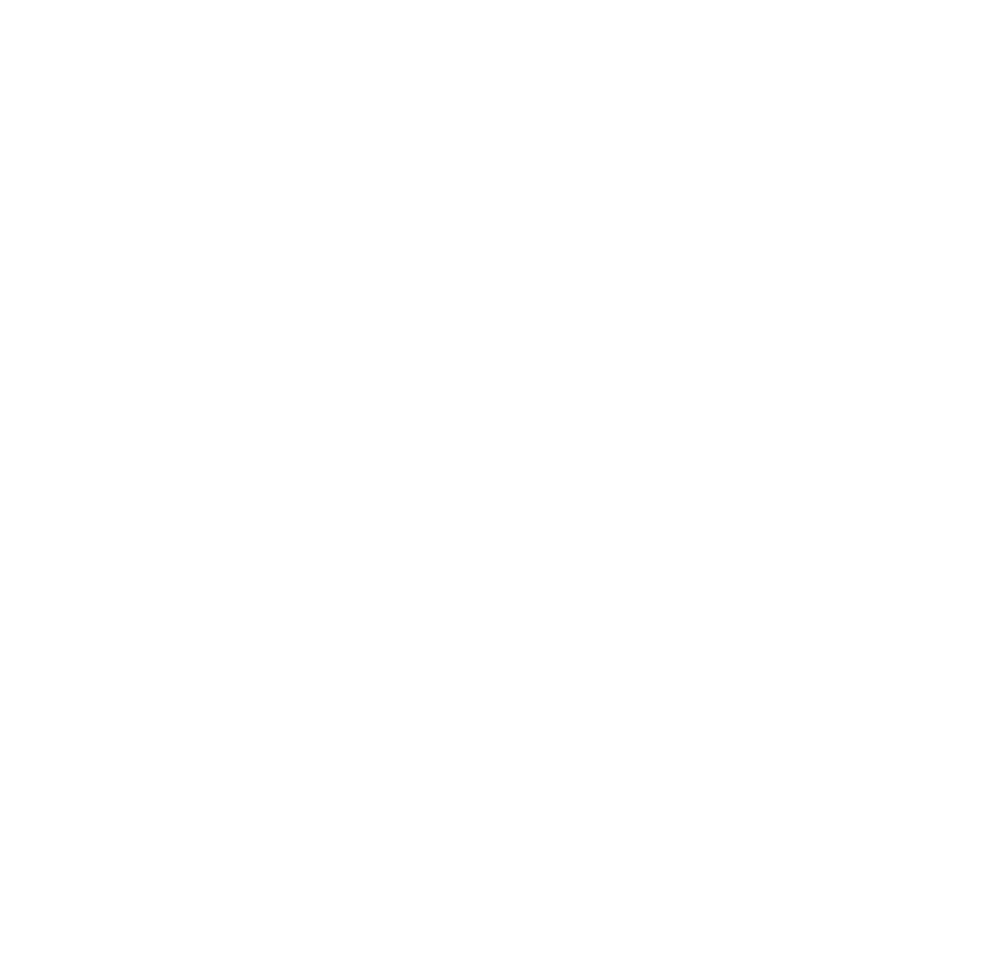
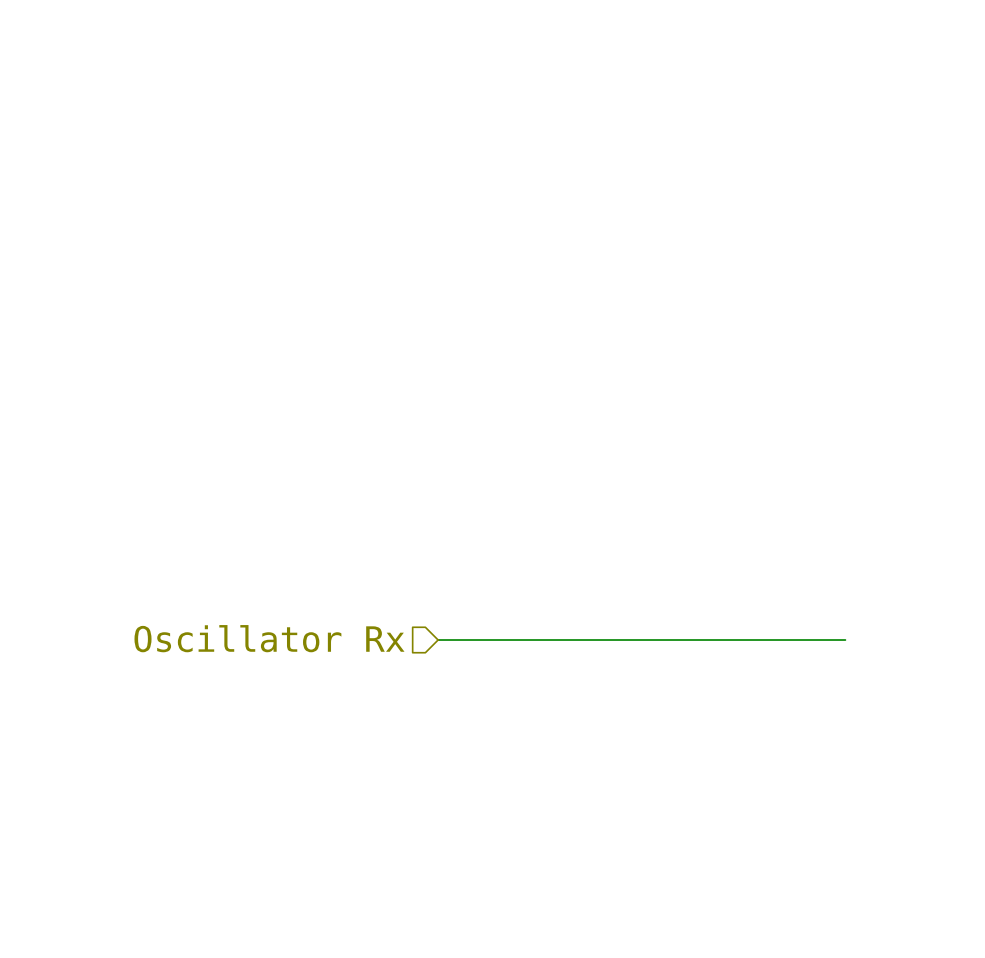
hierarchical label: none -> Oscillator Rx (269, 638)
wire: none -> (438, 640) (845, 640)

